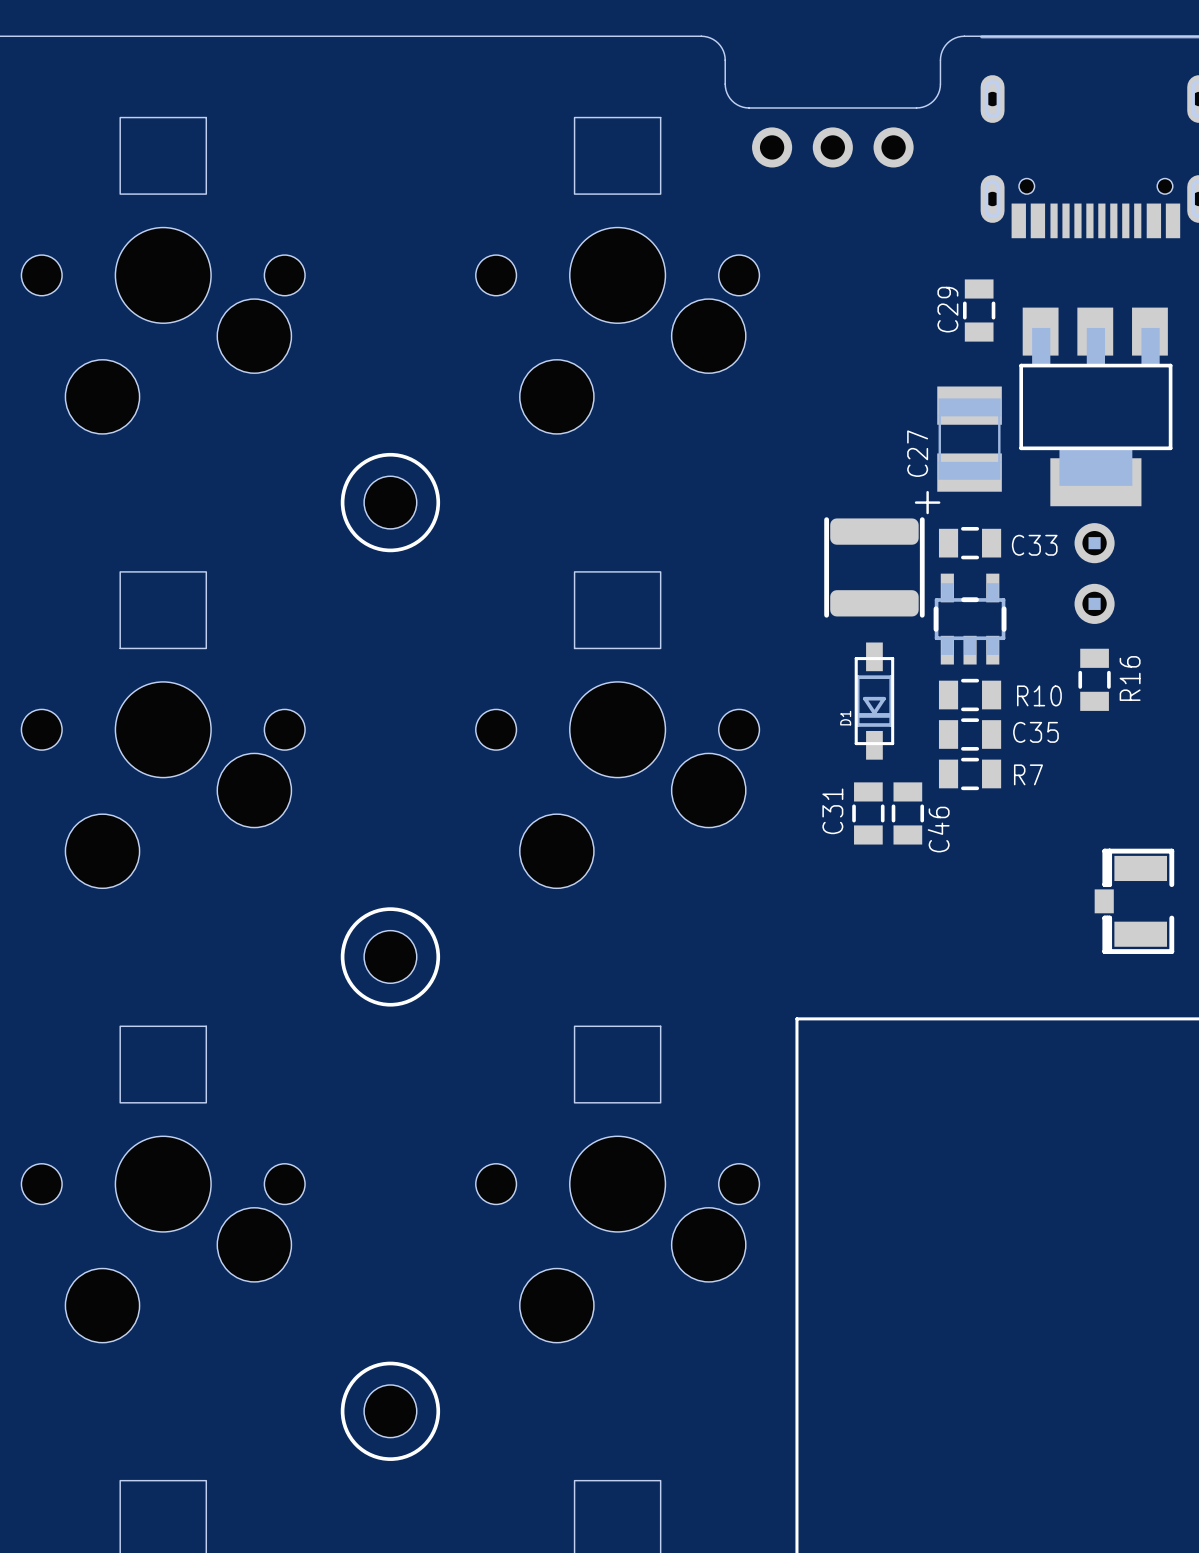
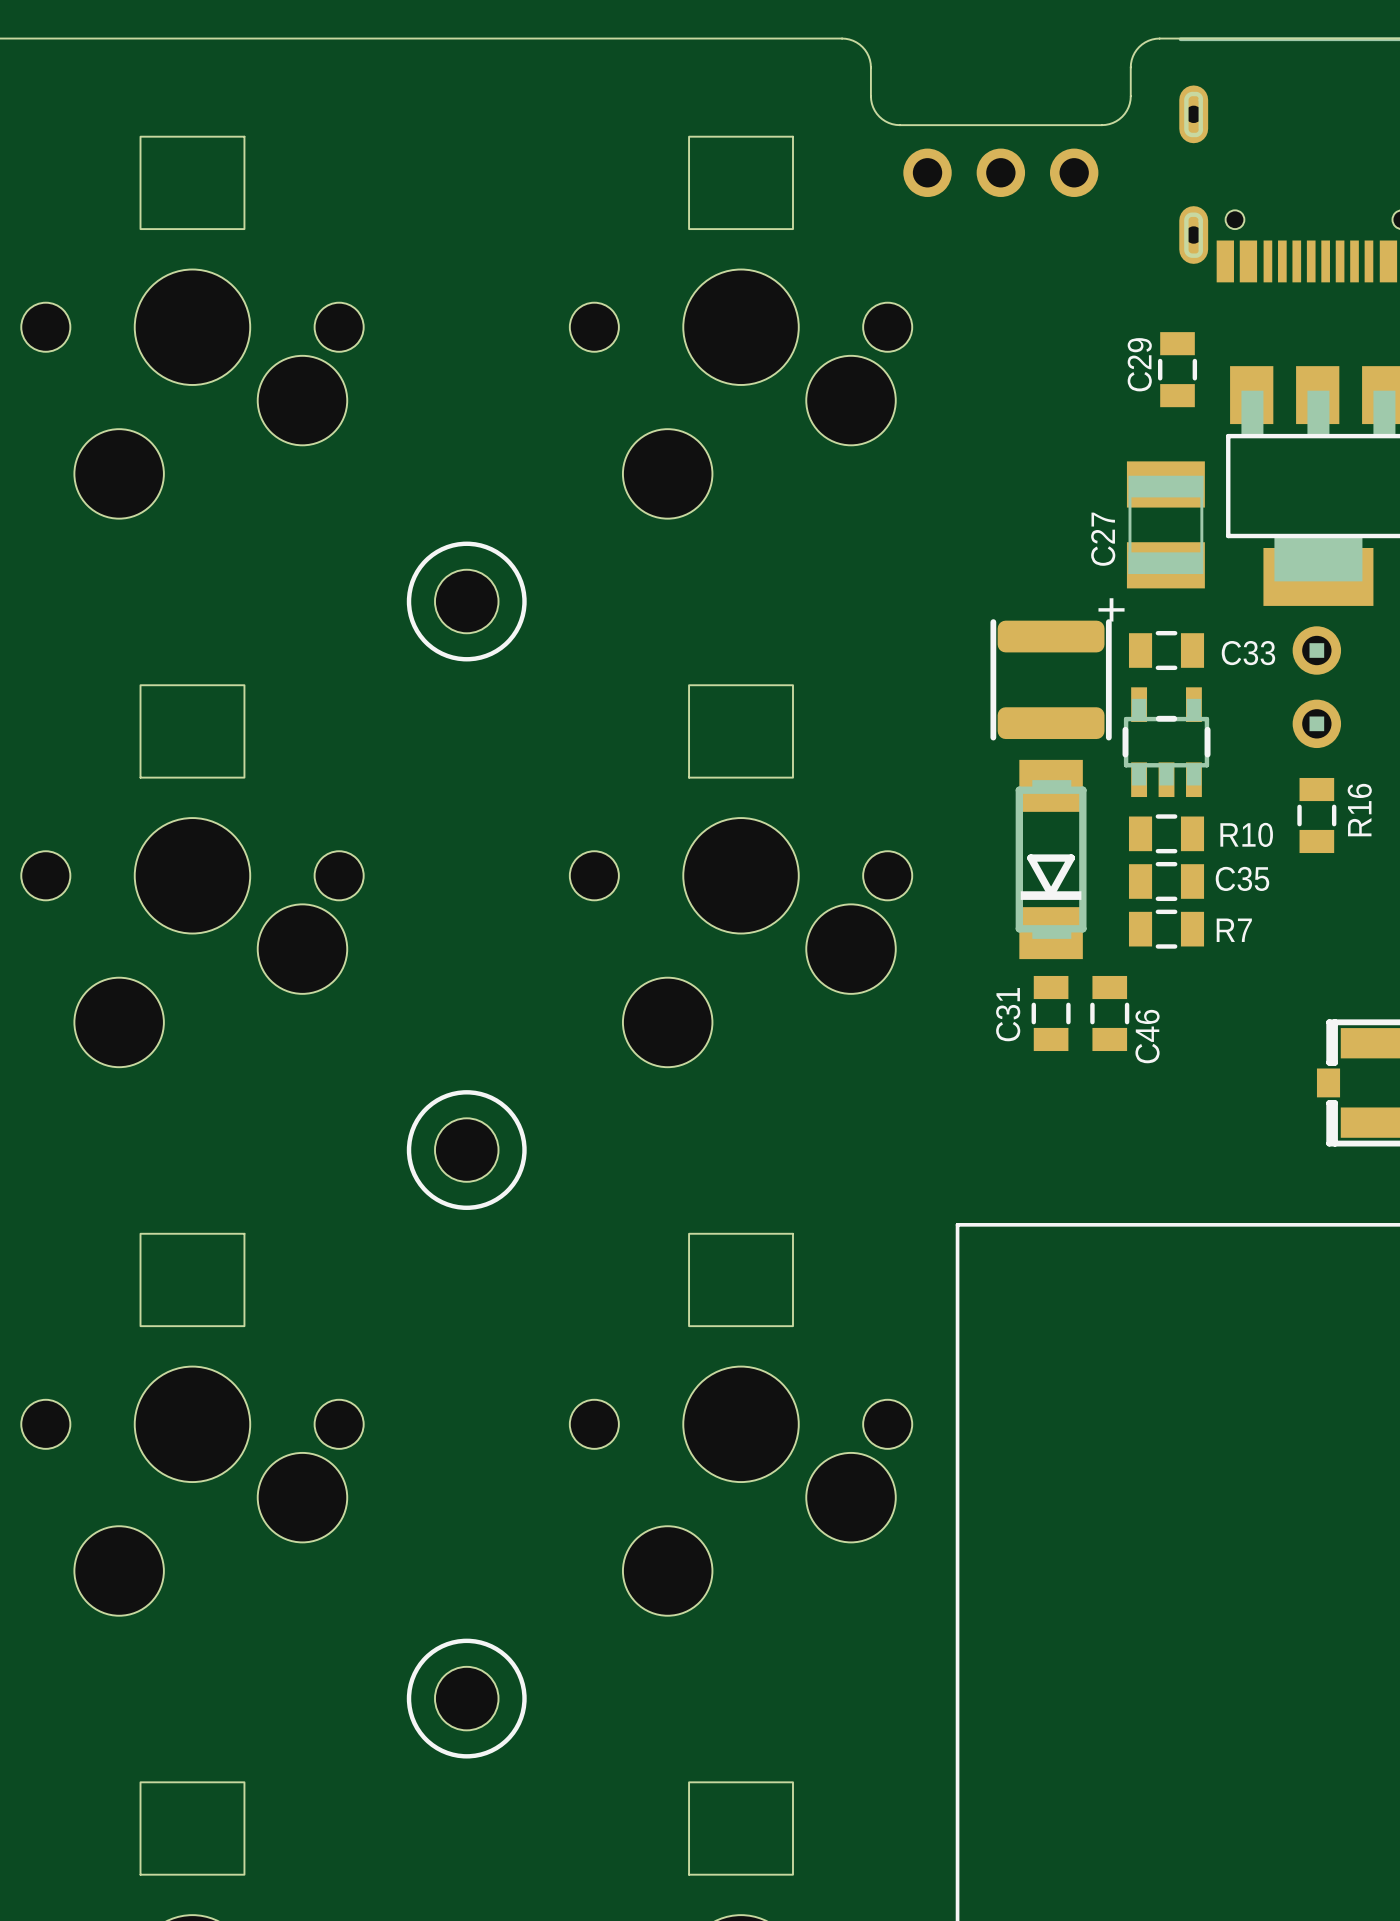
D1: (874, 701) -> none
part: none -> (1051, 859)
C31 position: (868, 813) -> (1051, 1013)
C46 position: (907, 813) -> (1109, 1013)

